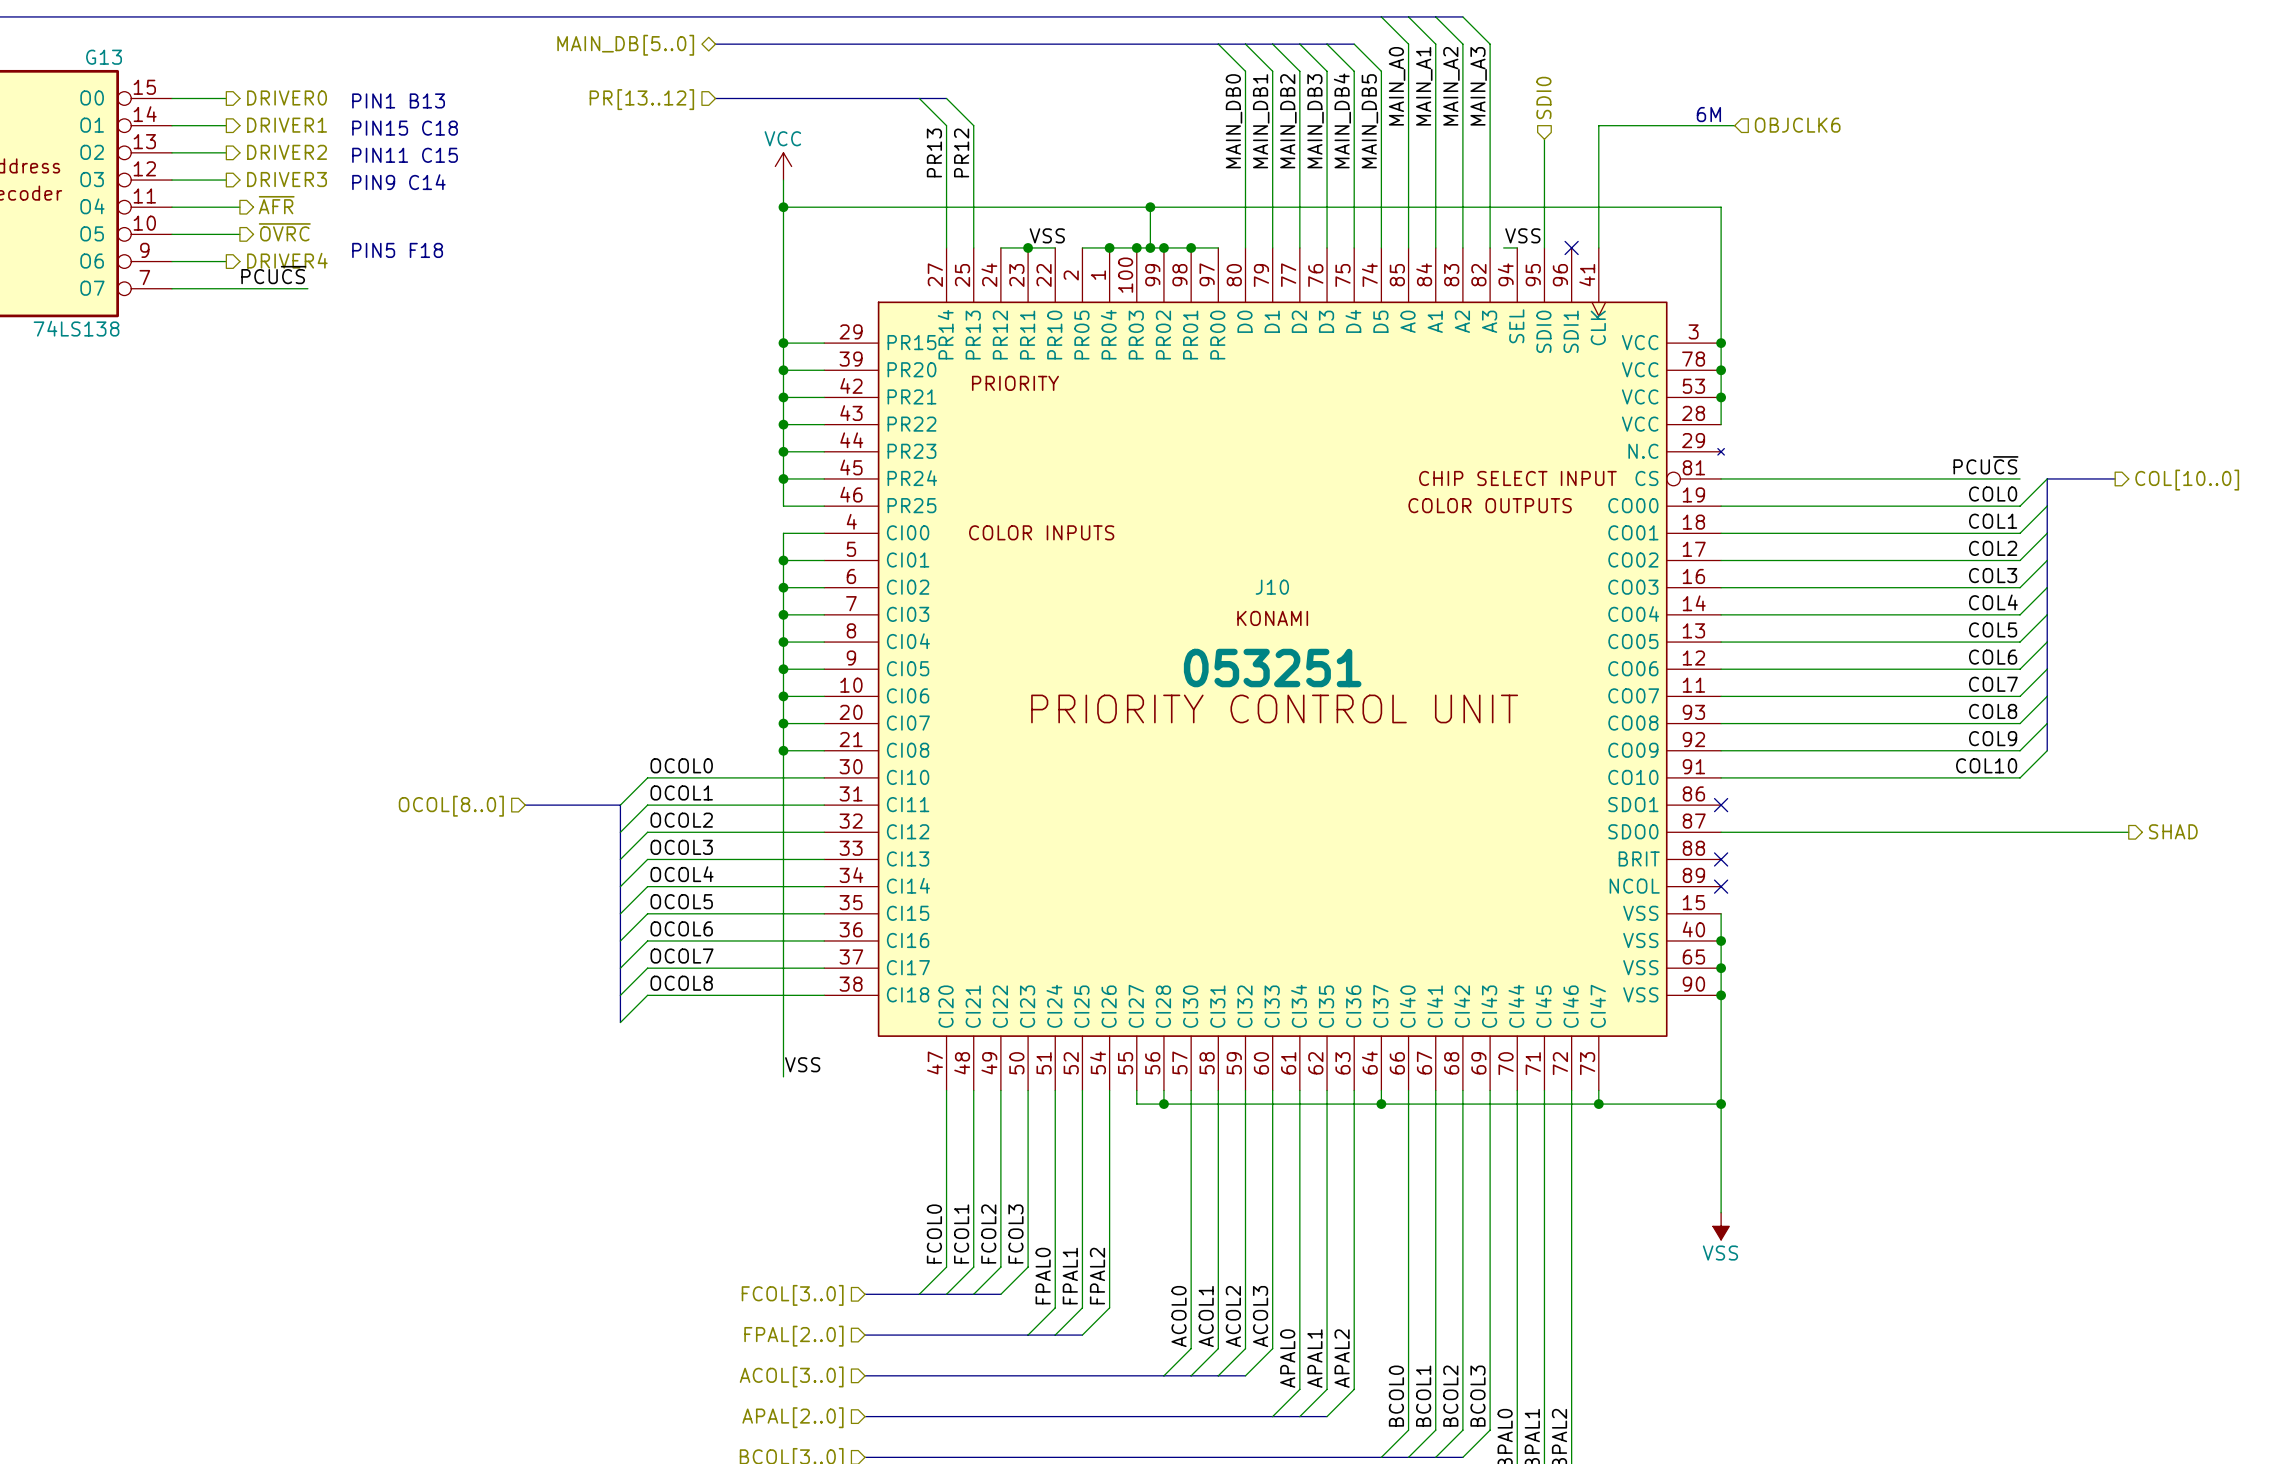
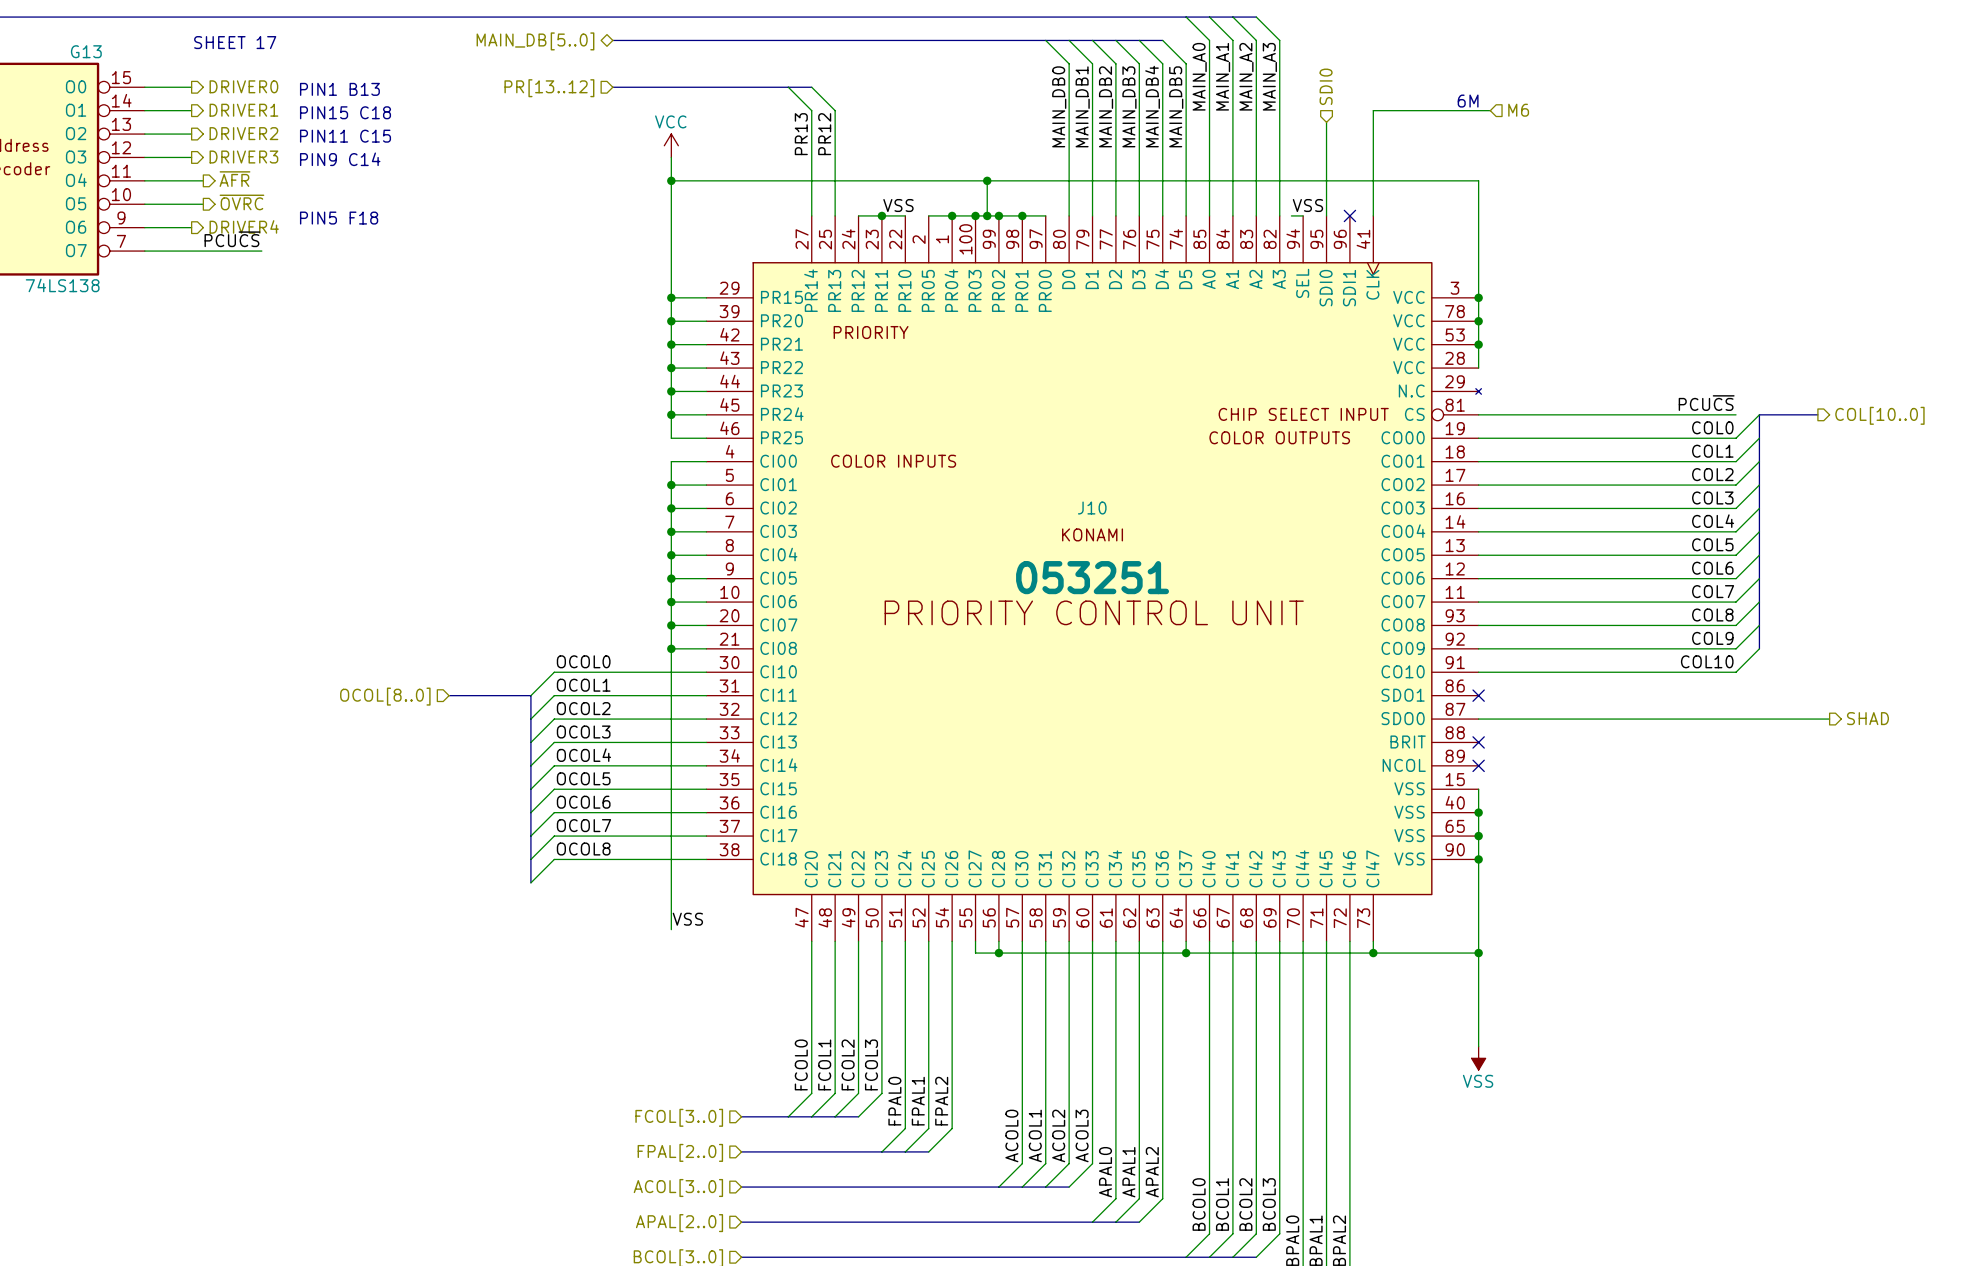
text: none -> SHEET 17 (235, 42)
hierarchical label: OBJCLK6 (1797, 125) -> M6 (1518, 110)

